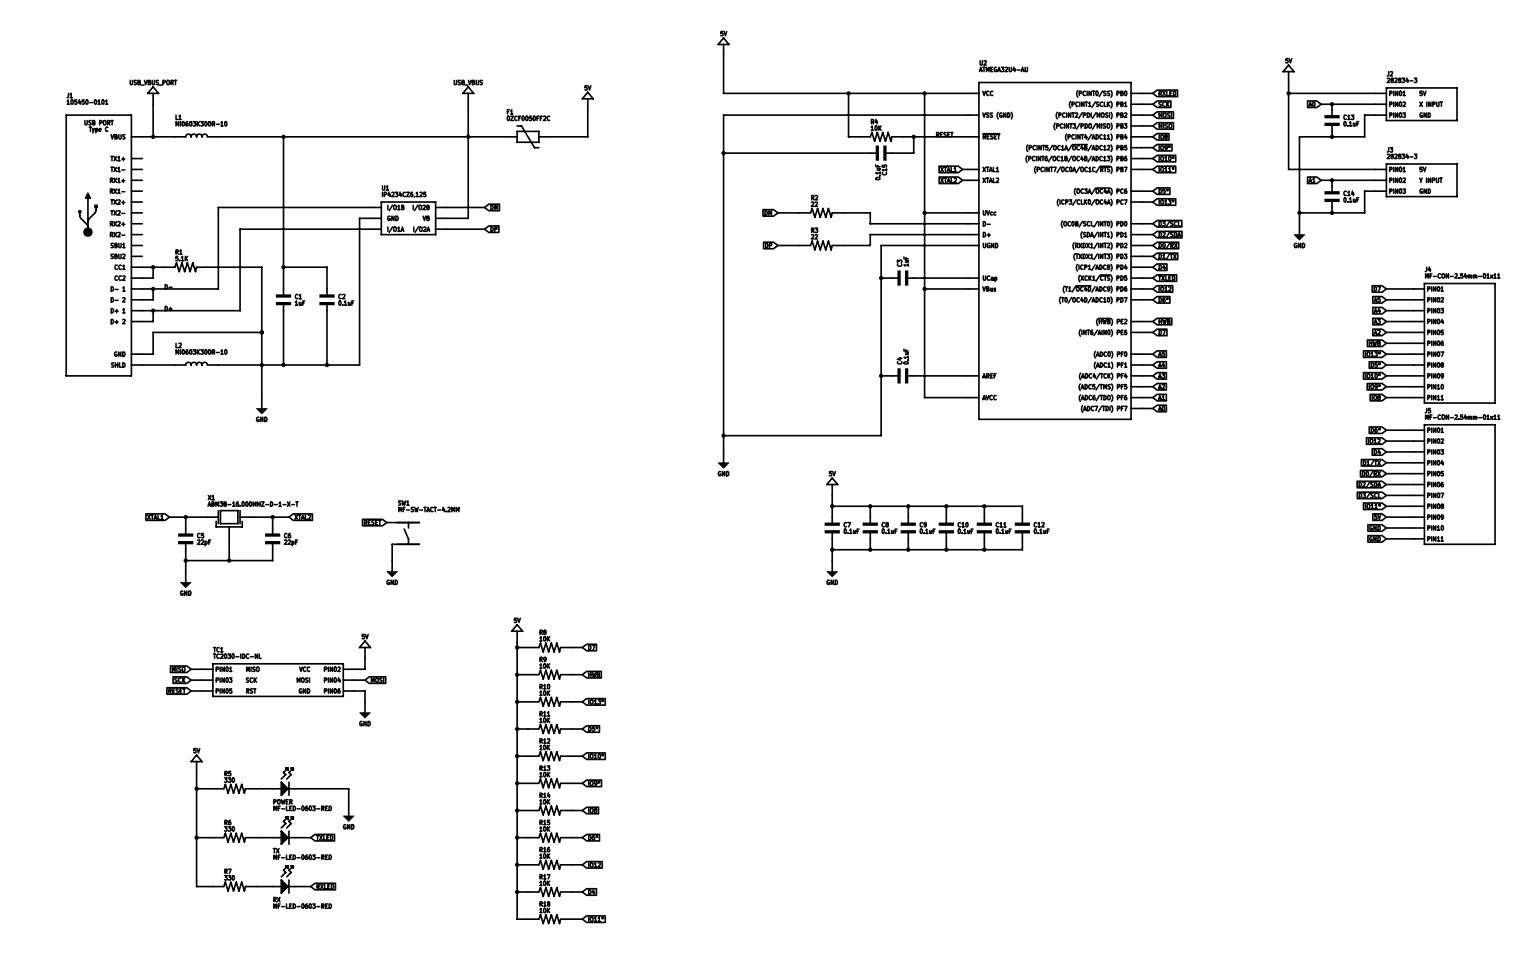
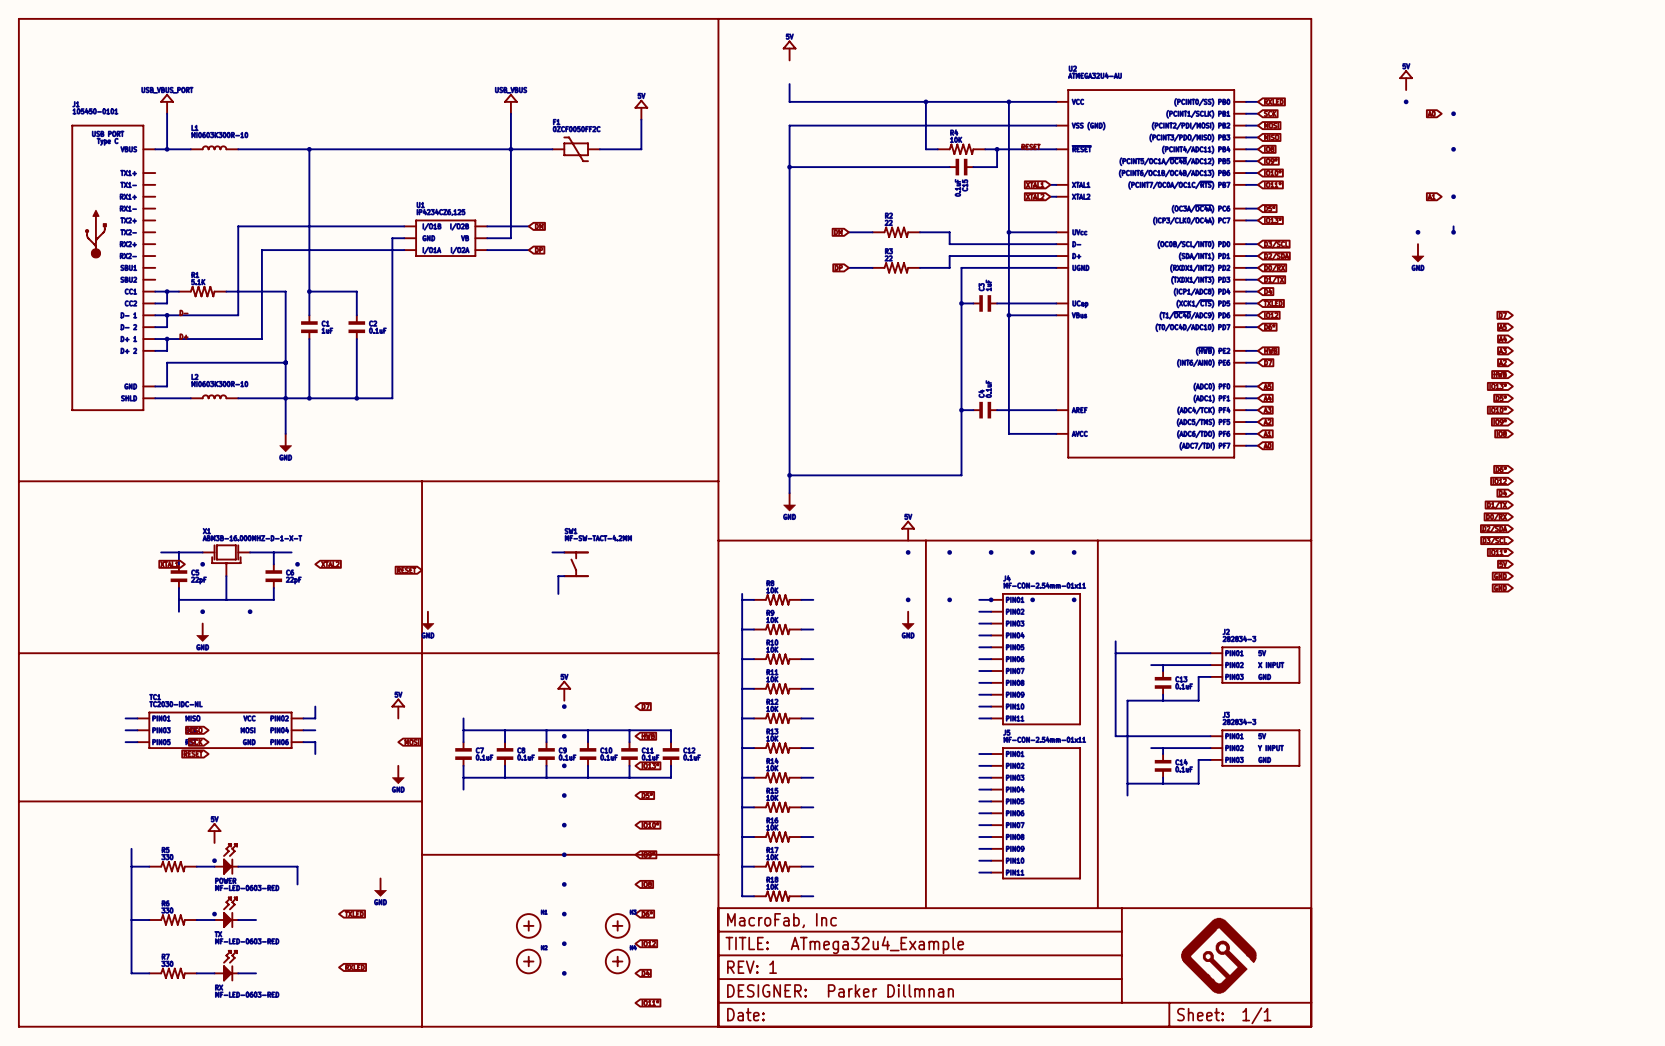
line: none -> (18, 18) (18, 1026) (1311, 1026) (1311, 18) (18, 18)
line: none -> (718, 18) (718, 1026)
wire: (723, 55) (723, 77) -> none
wire: (1288, 82) (1288, 169) (1375, 169) -> none
wire: (1288, 93) (1375, 93) -> none
wire: (1321, 104) (1375, 104) -> none
wire: (1332, 104) (1332, 109) -> none
part position: (1416, 104) -> (1255, 665)
wire: (1375, 115) (1364, 115) (1364, 136) (1299, 136) (1299, 223) -> none
part position: (1332, 120) -> (1163, 682)
wire: (1332, 131) (1332, 136) -> none
wire: (1321, 180) (1375, 180) -> none
wire: (1332, 180) (1332, 185) -> none
part position: (1416, 180) -> (1255, 748)
wire: (1375, 191) (1364, 191) (1364, 212) (1299, 212) -> none
part position: (1332, 196) -> (1163, 765)
wire: (1386, 288) (1413, 288) -> none
wire: (1386, 299) (1413, 299) -> none
wire: (1386, 310) (1413, 310) -> none
wire: (1386, 321) (1413, 321) -> none
wire: (1386, 332) (1413, 332) -> none
wire: (1386, 343) (1413, 343) -> none
part position: (1454, 343) -> (1035, 659)
wire: (1386, 354) (1413, 354) -> none
wire: (1386, 365) (1413, 365) -> none
wire: (1386, 375) (1413, 375) -> none
wire: (1386, 386) (1413, 386) -> none
wire: (1386, 397) (1413, 397) -> none
wire: (1386, 430) (1413, 430) -> none
line: none -> (18, 481) (718, 481)
line: none -> (422, 481) (422, 1026)
wire: (1386, 441) (1413, 441) -> none
wire: (1386, 451) (1413, 451) -> none
wire: (1386, 462) (1413, 462) -> none
wire: (1386, 473) (1413, 473) -> none
wire: (1386, 484) (1413, 484) -> none
part position: (1454, 484) -> (1035, 813)
line: none -> (718, 540) (1311, 540)
wire: (832, 495) (832, 517) -> none
line: none -> (925, 540) (925, 908)
line: none -> (1097, 540) (1097, 908)
wire: (1386, 495) (1413, 495) -> none
wire: none -> (250, 552) (291, 552)
wire: none -> (552, 552) (564, 552)
wire: (832, 506) (1022, 506) (1022, 517) -> none
wire: (870, 506) (870, 517) -> none
wire: (908, 506) (908, 517) -> none
wire: (946, 506) (946, 517) -> none
wire: (984, 506) (984, 517) -> none
wire: (1386, 506) (1413, 506) -> none
wire: (169, 517) (207, 517) -> (161, 552) (202, 552)
wire: (185, 517) (185, 527) -> (178, 552) (178, 564)
wire: (250, 517) (288, 517) -> (273, 564) (273, 552)
wire: (272, 517) (272, 527) -> none
wire: (1386, 517) (1413, 517) -> none
wire: (386, 522) (397, 522) -> none
part position: (229, 524) -> (226, 560)
wire: none -> (564, 576) (558, 576) (558, 593)
part position: (832, 527) -> (463, 754)
part position: (870, 527) -> (505, 754)
part position: (908, 527) -> (546, 754)
part position: (946, 527) -> (588, 754)
part position: (984, 527) -> (629, 754)
part position: (1022, 527) -> (671, 754)
wire: (1386, 527) (1413, 527) -> none
part position: (408, 533) -> (576, 564)
part position: (185, 538) -> (178, 576)
wire: (229, 538) (229, 560) -> (226, 576) (226, 599)
part position: (272, 538) -> (273, 576)
wire: (832, 538) (832, 560) -> none
wire: (870, 538) (870, 549) -> none
wire: (908, 538) (908, 549) (1022, 549) (1022, 538) -> none
wire: (946, 538) (946, 549) -> none
wire: (984, 538) (984, 549) -> none
wire: (1386, 538) (1413, 538) -> none
wire: (397, 544) (392, 544) (392, 560) -> none
wire: none -> (742, 593) (742, 896) (754, 896)
wire: (185, 549) (185, 571) -> (178, 588) (178, 611)
wire: (272, 549) (272, 560) (185, 560) -> (273, 588) (273, 599) (178, 599)
wire: none -> (742, 599) (754, 599)
wire: none -> (801, 599) (813, 599)
wire: (832, 549) (897, 549) -> none
wire: none -> (979, 611) (991, 611)
wire: none -> (979, 623) (991, 623)
wire: none -> (742, 629) (754, 629)
wire: none -> (801, 629) (813, 629)
wire: none -> (979, 635) (991, 635)
wire: none -> (1115, 641) (1115, 736) (1210, 736)
wire: none -> (979, 647) (991, 647)
line: none -> (18, 653) (718, 653)
wire: none -> (1115, 653) (1210, 653)
wire: none -> (742, 659) (754, 659)
wire: none -> (801, 659) (813, 659)
wire: none -> (979, 659) (991, 659)
wire: none -> (1151, 665) (1210, 665)
wire: none -> (1163, 665) (1163, 671)
wire: none -> (979, 671) (991, 671)
wire: none -> (1210, 676) (1198, 676) (1198, 700) (1127, 700) (1127, 795)
wire: none -> (979, 682) (991, 682)
wire: none -> (742, 688) (754, 688)
wire: none -> (801, 688) (813, 688)
wire: none -> (979, 694) (991, 694)
wire: none -> (1163, 694) (1163, 700)
wire: (517, 642) (517, 919) (527, 919) -> none
wire: (517, 647) (527, 647) -> none
part position: (549, 647) -> (777, 599)
wire: (571, 647) (582, 647) -> none
wire: none -> (979, 706) (991, 706)
wire: (365, 658) (365, 669) (354, 669) -> (315, 706) (315, 718) (303, 718)
wire: none -> (463, 718) (463, 742)
wire: none -> (742, 718) (754, 718)
wire: none -> (801, 718) (813, 718)
wire: none -> (979, 718) (991, 718)
wire: (191, 669) (202, 669) -> (125, 718) (137, 718)
wire: none -> (463, 730) (671, 730) (671, 742)
wire: none -> (505, 730) (505, 742)
wire: none -> (546, 730) (546, 742)
wire: none -> (588, 730) (588, 742)
wire: none -> (629, 730) (629, 742)
wire: (517, 674) (527, 674) -> none
part position: (549, 674) -> (777, 629)
wire: (571, 674) (582, 674) -> none
wire: (191, 680) (202, 680) -> (125, 730) (137, 730)
part position: (278, 680) -> (220, 730)
wire: (354, 680) (365, 680) -> (303, 730) (315, 730)
wire: none -> (742, 748) (754, 748)
wire: none -> (801, 748) (813, 748)
wire: none -> (1151, 748) (1210, 748)
wire: none -> (1163, 748) (1163, 754)
wire: (191, 690) (202, 690) -> (125, 742) (137, 742)
wire: (354, 690) (365, 690) (365, 701) -> (303, 742) (315, 742) (315, 754)
wire: none -> (979, 754) (991, 754)
wire: none -> (1210, 759) (1198, 759) (1198, 783) (1127, 783)
wire: none -> (463, 765) (463, 789)
wire: none -> (505, 765) (505, 777)
wire: none -> (546, 765) (546, 777)
wire: (517, 701) (527, 701) -> none
wire: none -> (588, 765) (588, 777)
part position: (549, 701) -> (777, 659)
wire: (571, 701) (582, 701) -> none
wire: none -> (629, 765) (629, 777)
wire: none -> (671, 765) (671, 777) (463, 777)
wire: none -> (979, 765) (991, 765)
wire: none -> (742, 777) (754, 777)
wire: none -> (801, 777) (813, 777)
wire: none -> (979, 777) (991, 777)
wire: none -> (1163, 777) (1163, 783)
wire: none -> (979, 789) (991, 789)
wire: (517, 729) (527, 729) -> none
part position: (549, 729) -> (777, 688)
wire: (571, 729) (582, 729) -> none
line: none -> (18, 801) (422, 801)
wire: none -> (979, 801) (991, 801)
wire: none -> (742, 807) (754, 807)
wire: none -> (801, 807) (813, 807)
wire: none -> (979, 813) (991, 813)
wire: (517, 756) (527, 756) -> none
part position: (549, 756) -> (777, 718)
wire: (571, 756) (582, 756) -> none
wire: none -> (979, 825) (991, 825)
wire: none -> (742, 837) (754, 837)
wire: none -> (801, 837) (813, 837)
wire: none -> (979, 837) (991, 837)
wire: (196, 772) (196, 886) (212, 886) -> (131, 848) (131, 973) (149, 973)
wire: none -> (979, 848) (991, 848)
part position: (283, 781) -> (226, 858)
line: none -> (422, 854) (718, 854)
part position: (549, 783) -> (777, 748)
wire: (196, 788) (212, 788) -> (131, 866) (149, 866)
part position: (234, 788) -> (173, 866)
wire: (256, 788) (272, 788) -> (196, 866) (214, 866)
wire: (294, 788) (348, 788) (348, 805) -> (238, 866) (297, 866) (297, 884)
wire: none -> (979, 860) (991, 860)
wire: none -> (742, 866) (754, 866)
wire: none -> (801, 866) (813, 866)
wire: none -> (979, 872) (991, 872)
wire: (517, 810) (527, 810) -> none
part position: (549, 810) -> (777, 777)
wire: (571, 810) (582, 810) -> none
wire: none -> (801, 896) (813, 896)
part position: (283, 830) -> (226, 912)
wire: (196, 837) (212, 837) -> (131, 920) (149, 920)
part position: (234, 837) -> (173, 920)
wire: (256, 837) (272, 837) -> (196, 920) (214, 920)
wire: (294, 837) (310, 837) -> (238, 920) (256, 920)
wire: (517, 837) (527, 837) -> none
part position: (549, 837) -> (777, 807)
wire: (571, 837) (582, 837) -> none
part: none -> (528, 925)
part: none -> (617, 925)
wire: (517, 864) (527, 864) -> none
part position: (549, 864) -> (777, 837)
wire: (571, 864) (582, 864) -> none
part position: (283, 879) -> (226, 965)
part: none -> (528, 961)
part: none -> (617, 961)
part position: (234, 886) -> (173, 973)
wire: (256, 886) (272, 886) -> (196, 973) (214, 973)
wire: (294, 886) (310, 886) -> (238, 973) (256, 973)
part: none -> (1014, 967)
wire: (517, 891) (527, 891) -> none
part position: (549, 891) -> (777, 866)
wire: (571, 891) (582, 891) -> none
part position: (549, 919) -> (777, 896)
wire: (571, 919) (582, 919) -> none

